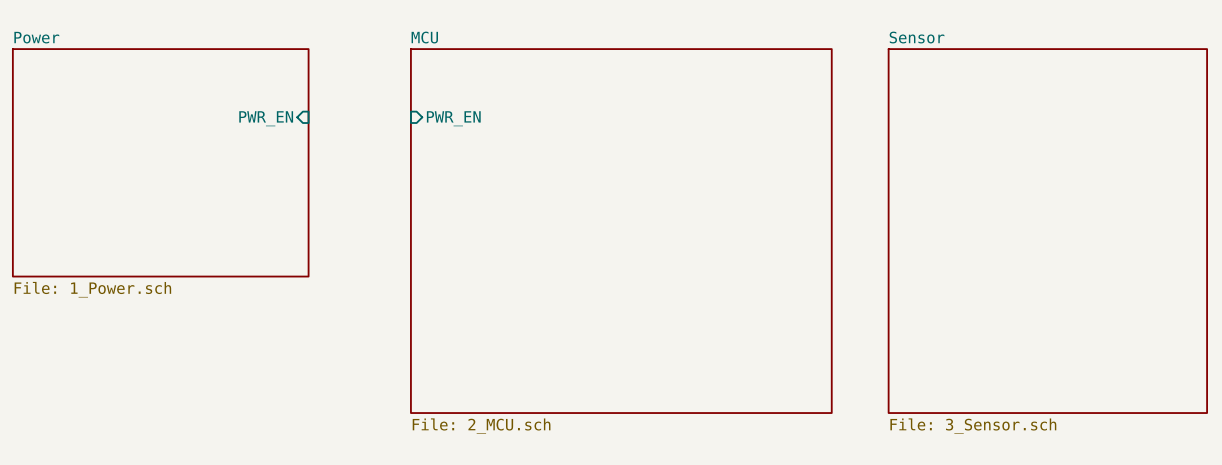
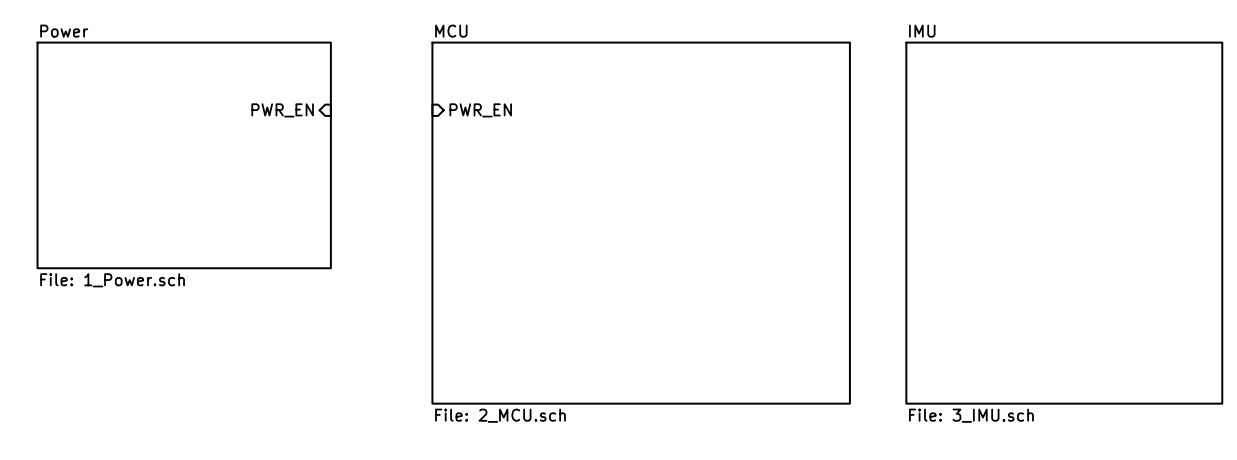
sheet Sensor name: Sensor (917, 37) -> IMU (922, 31)
sheet Sensor value: File: 3_Sensor.sch (973, 426) -> File: 3_IMU.sch (971, 415)

